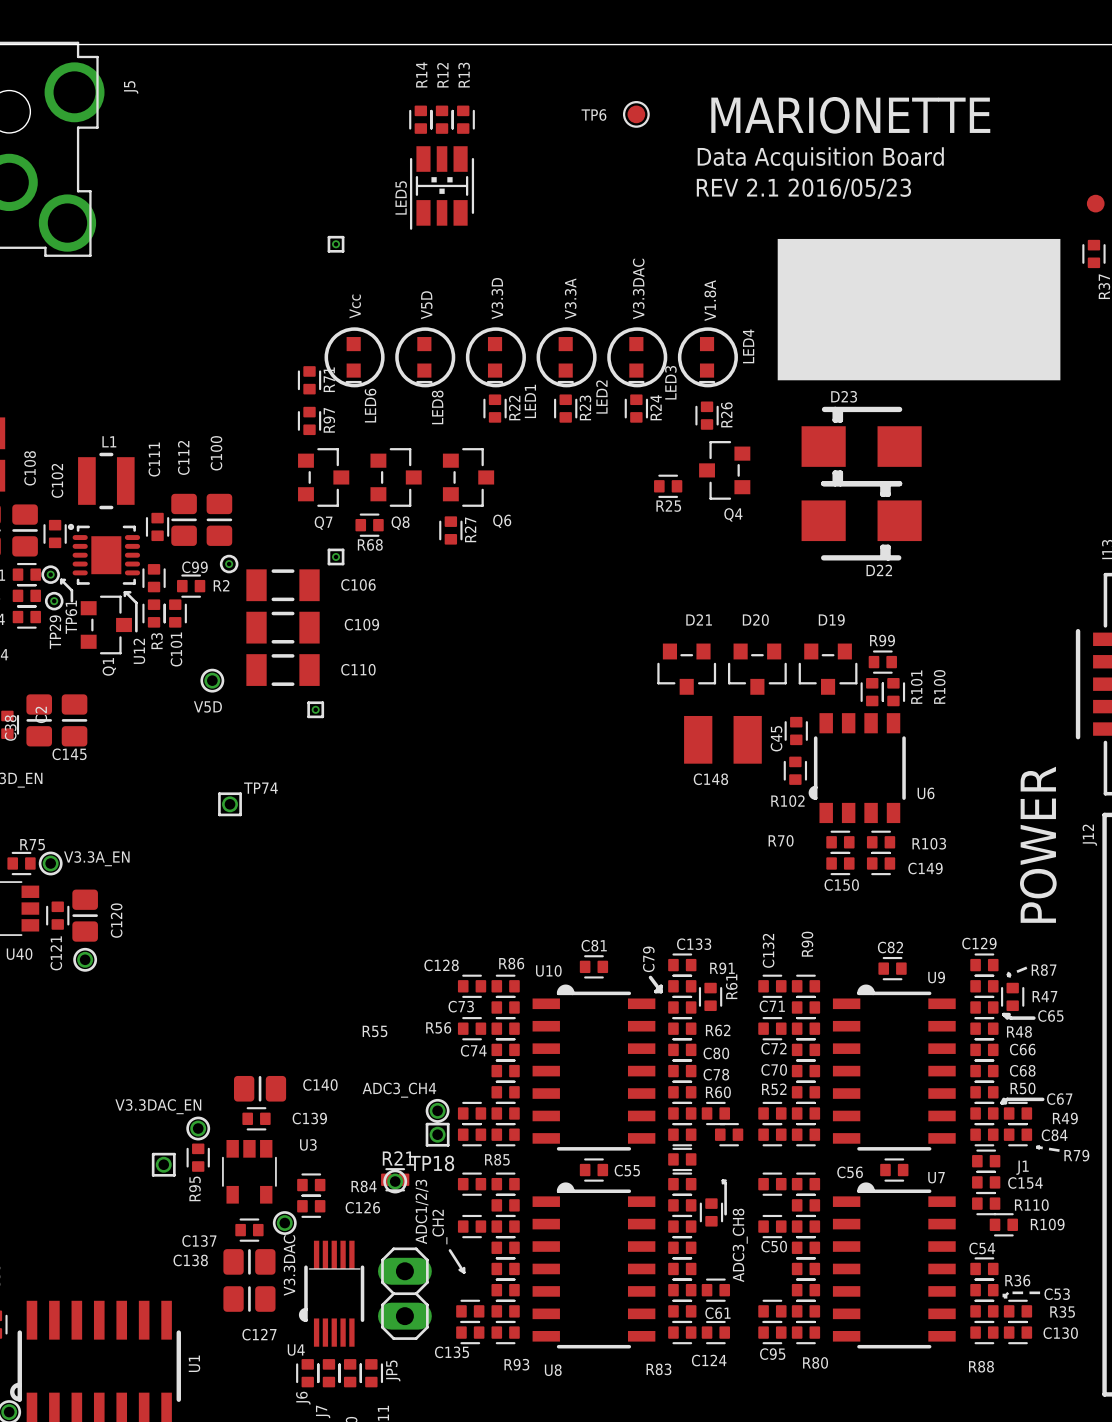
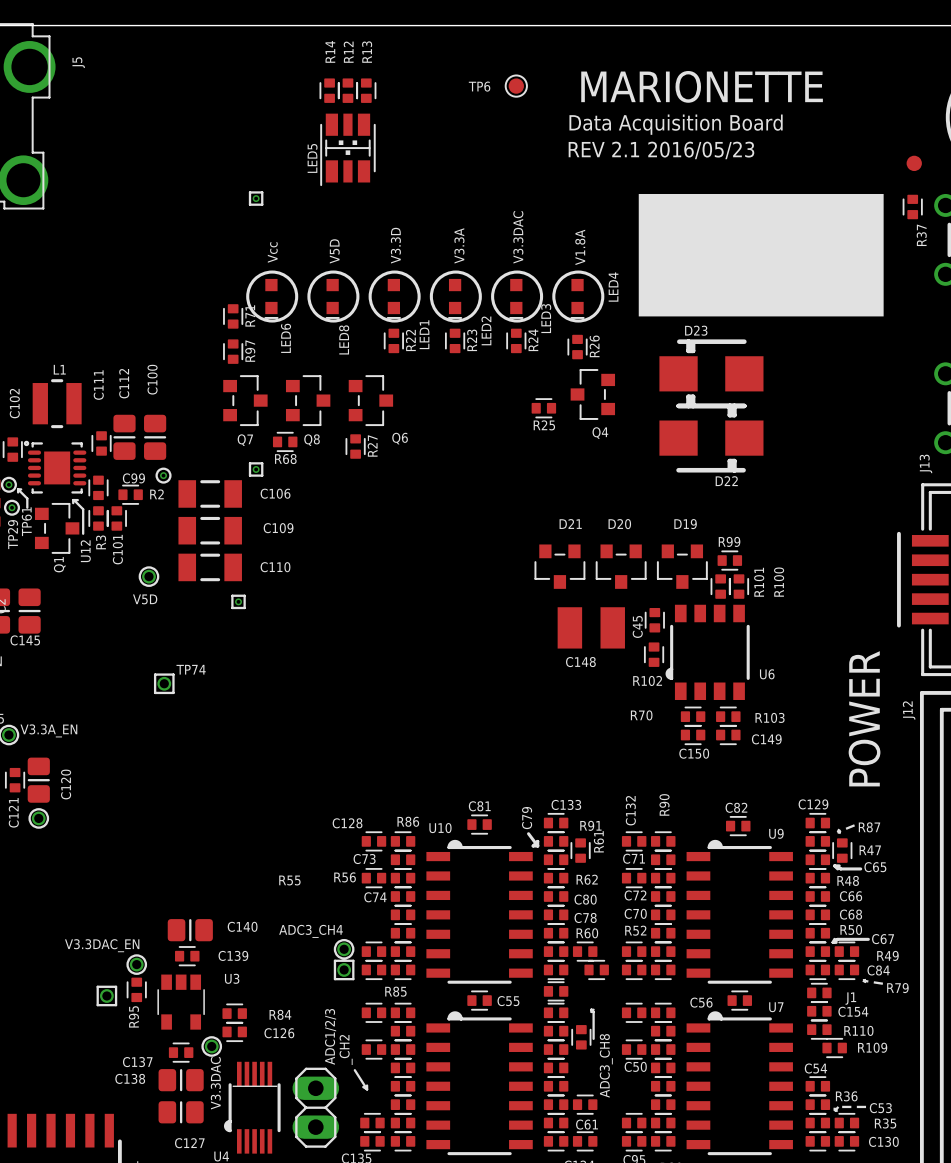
R21: (395, 1179) -> none
TP18: (395, 1181) -> none

